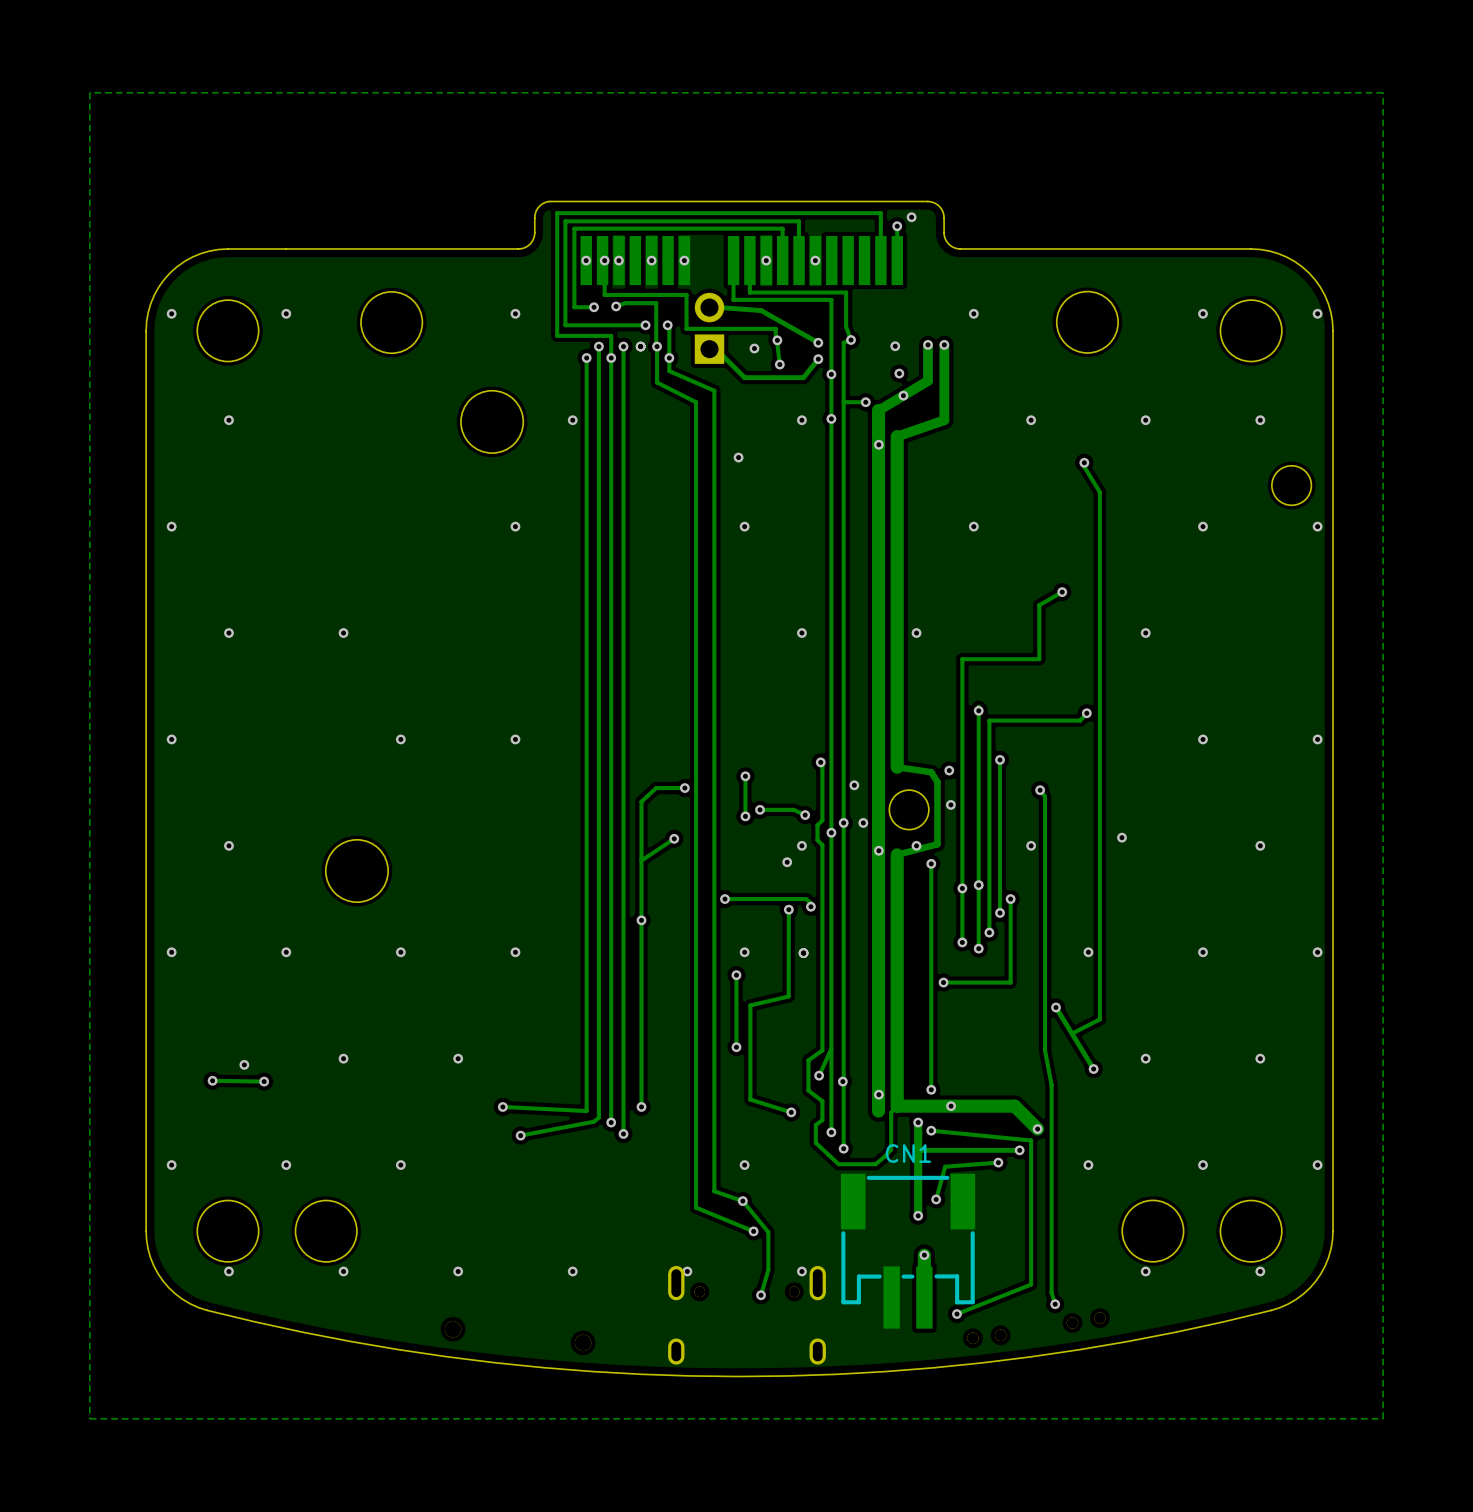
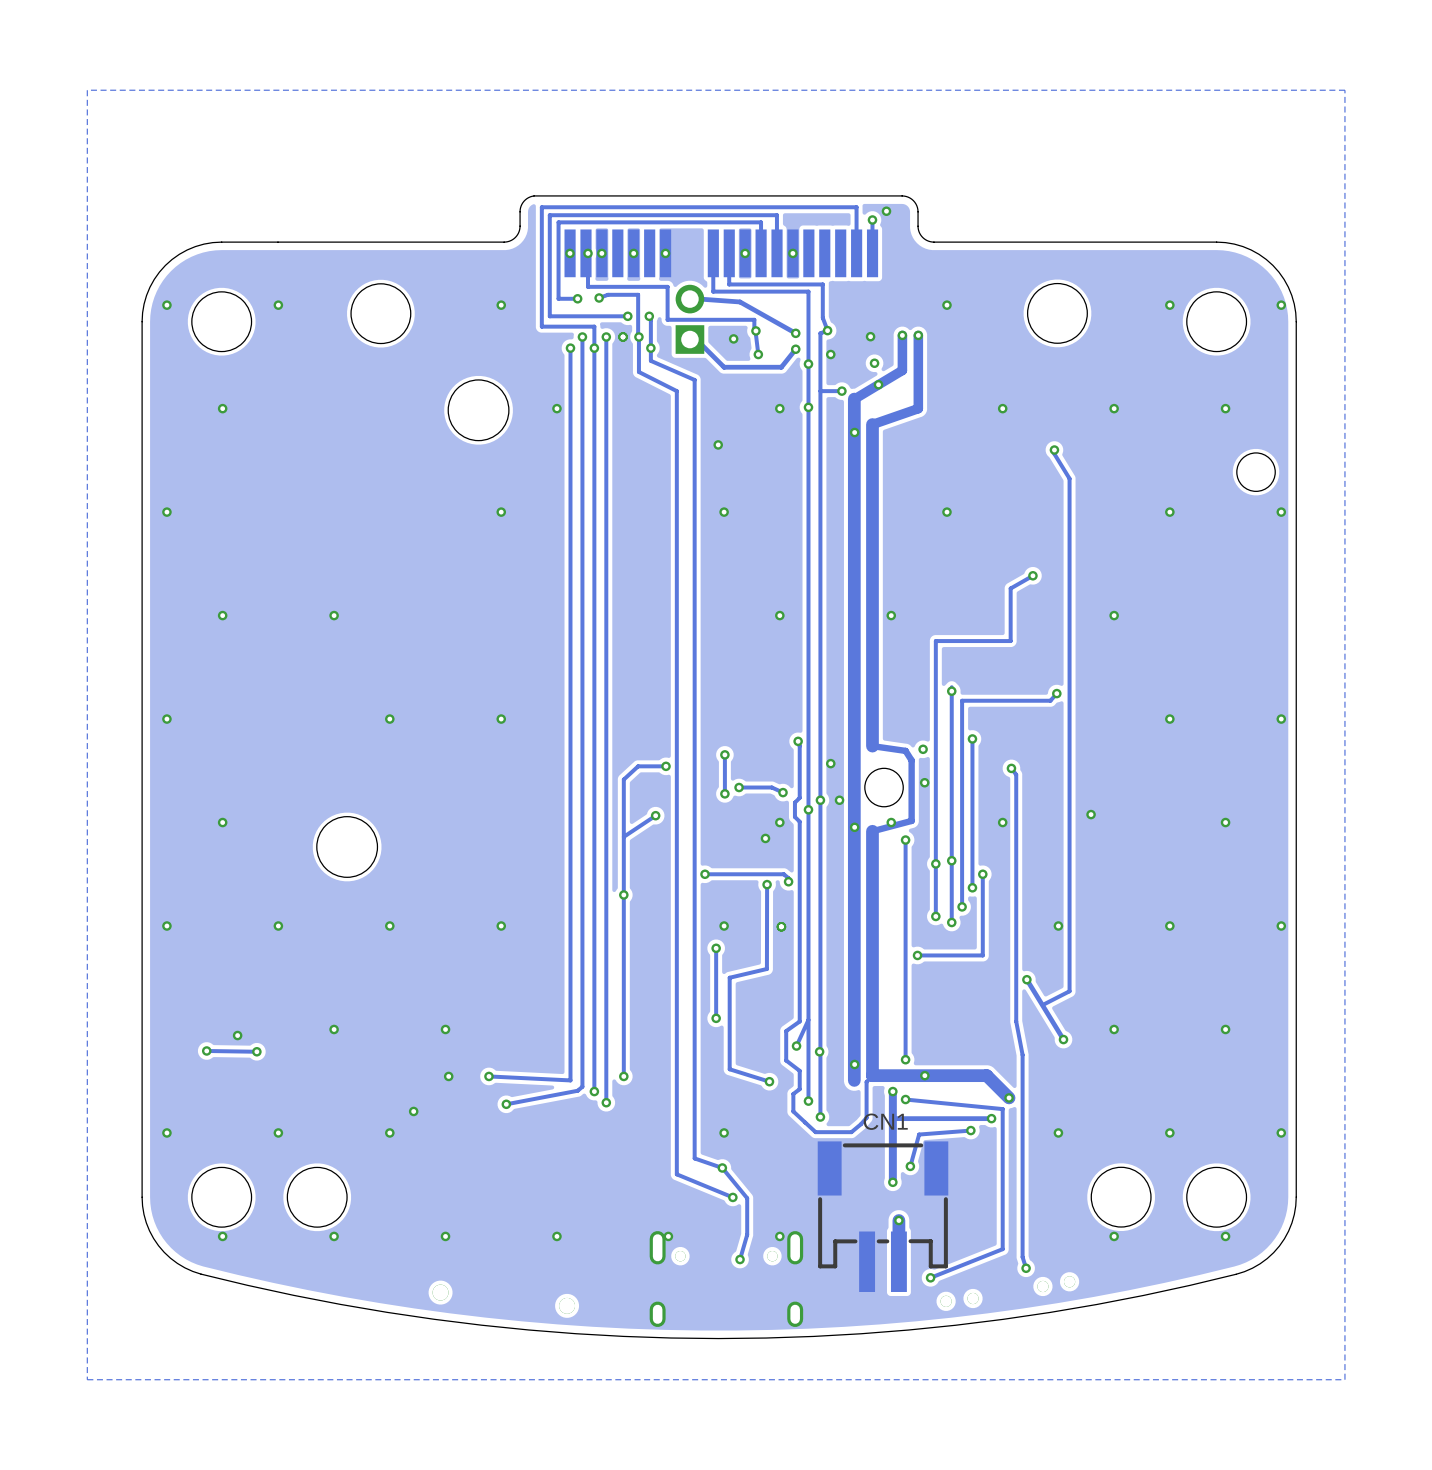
via: none -> (830, 354)
via: none -> (448, 1076)
via: none -> (413, 1111)

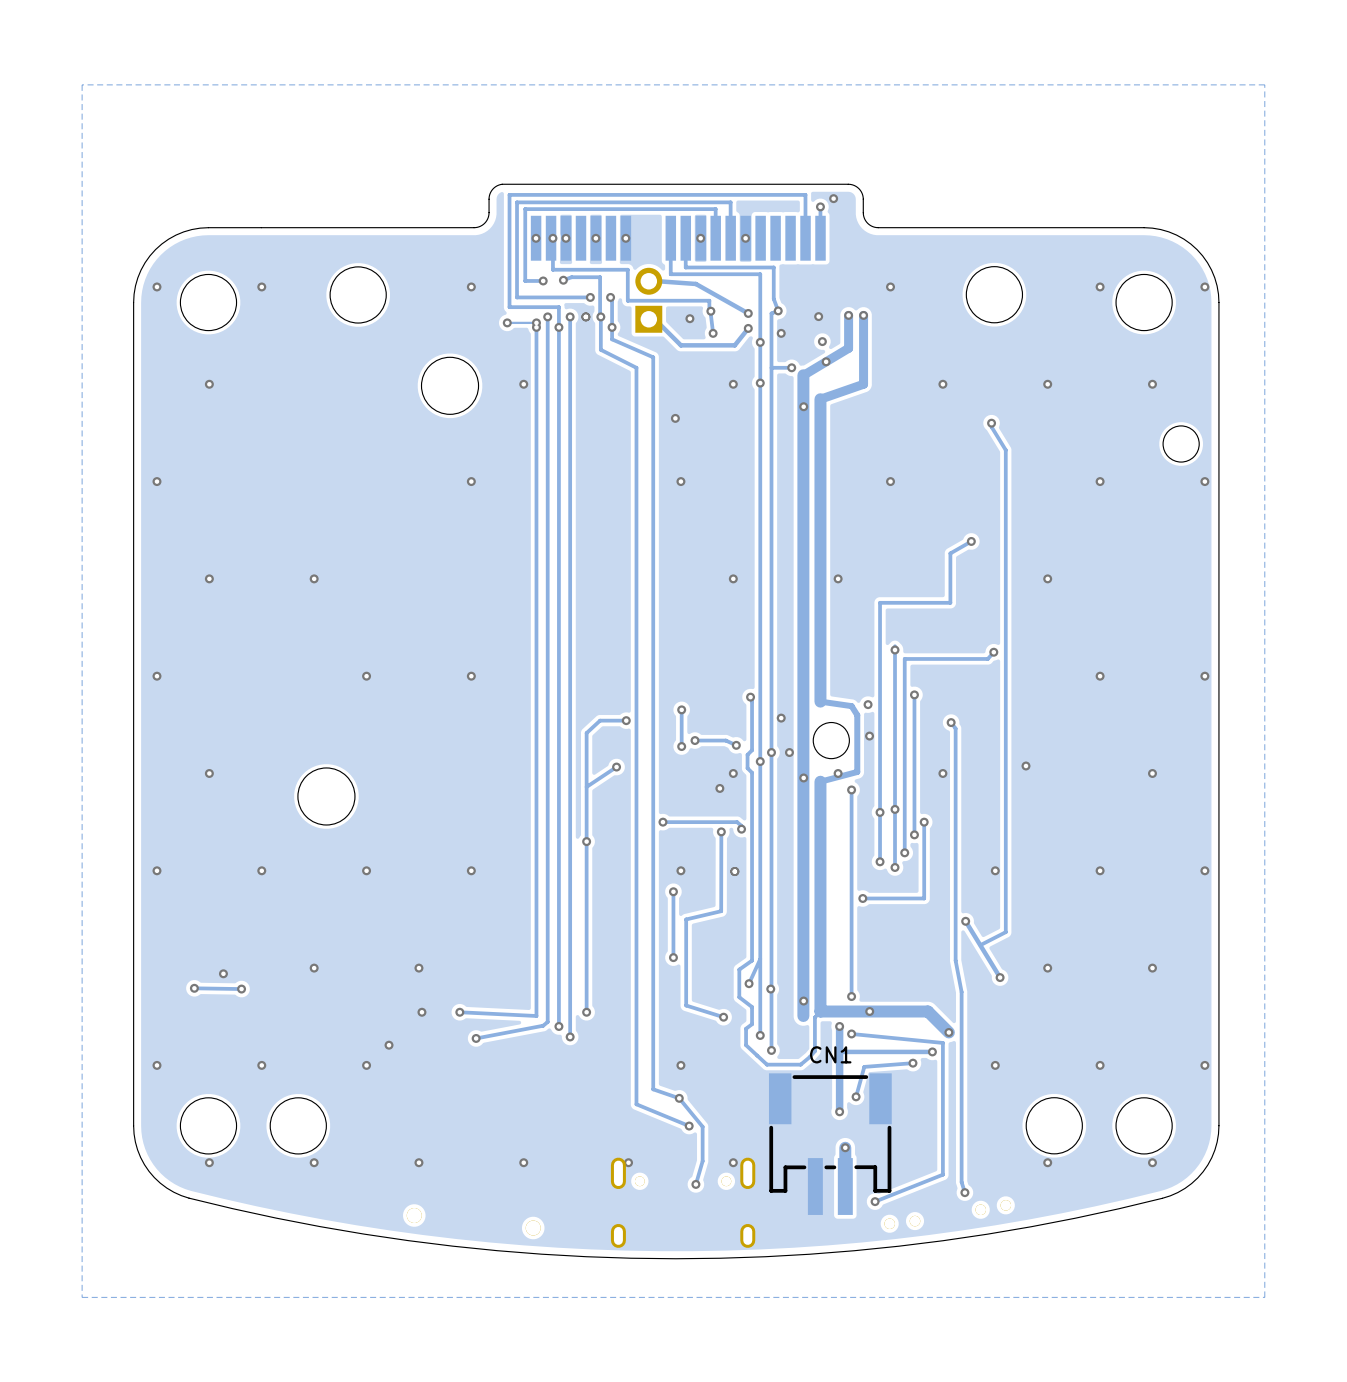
via: none -> (507, 322)
track: none -> (536, 322) (507, 322)
via: none -> (536, 322)

